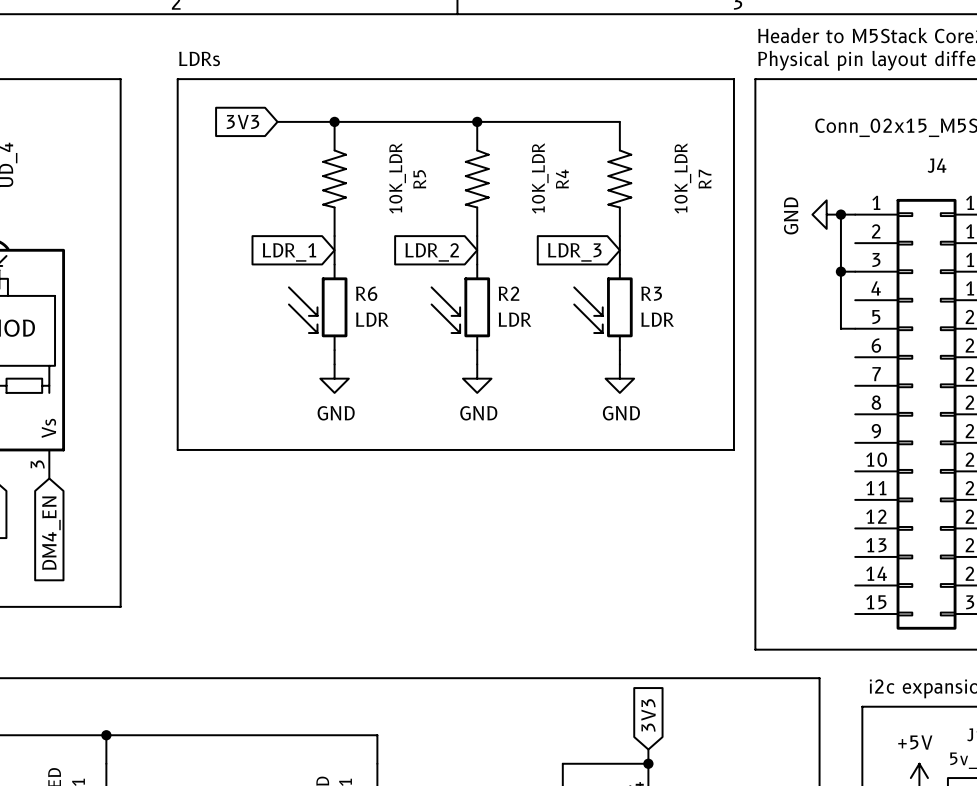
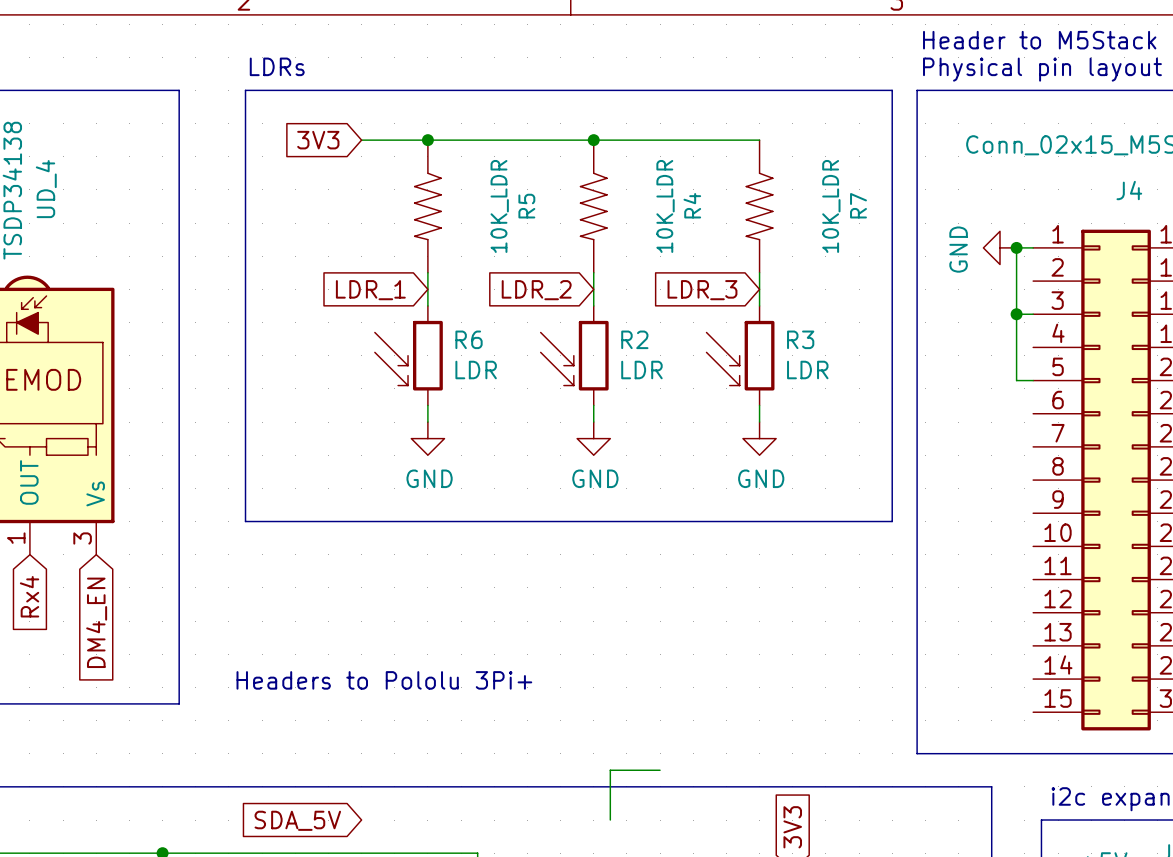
text: none -> Headers to Pololu 3Pi+ (384, 680)
wire: none -> (660, 770) (610, 770) (610, 820)
global label: none -> SDA_5V (297, 820)

